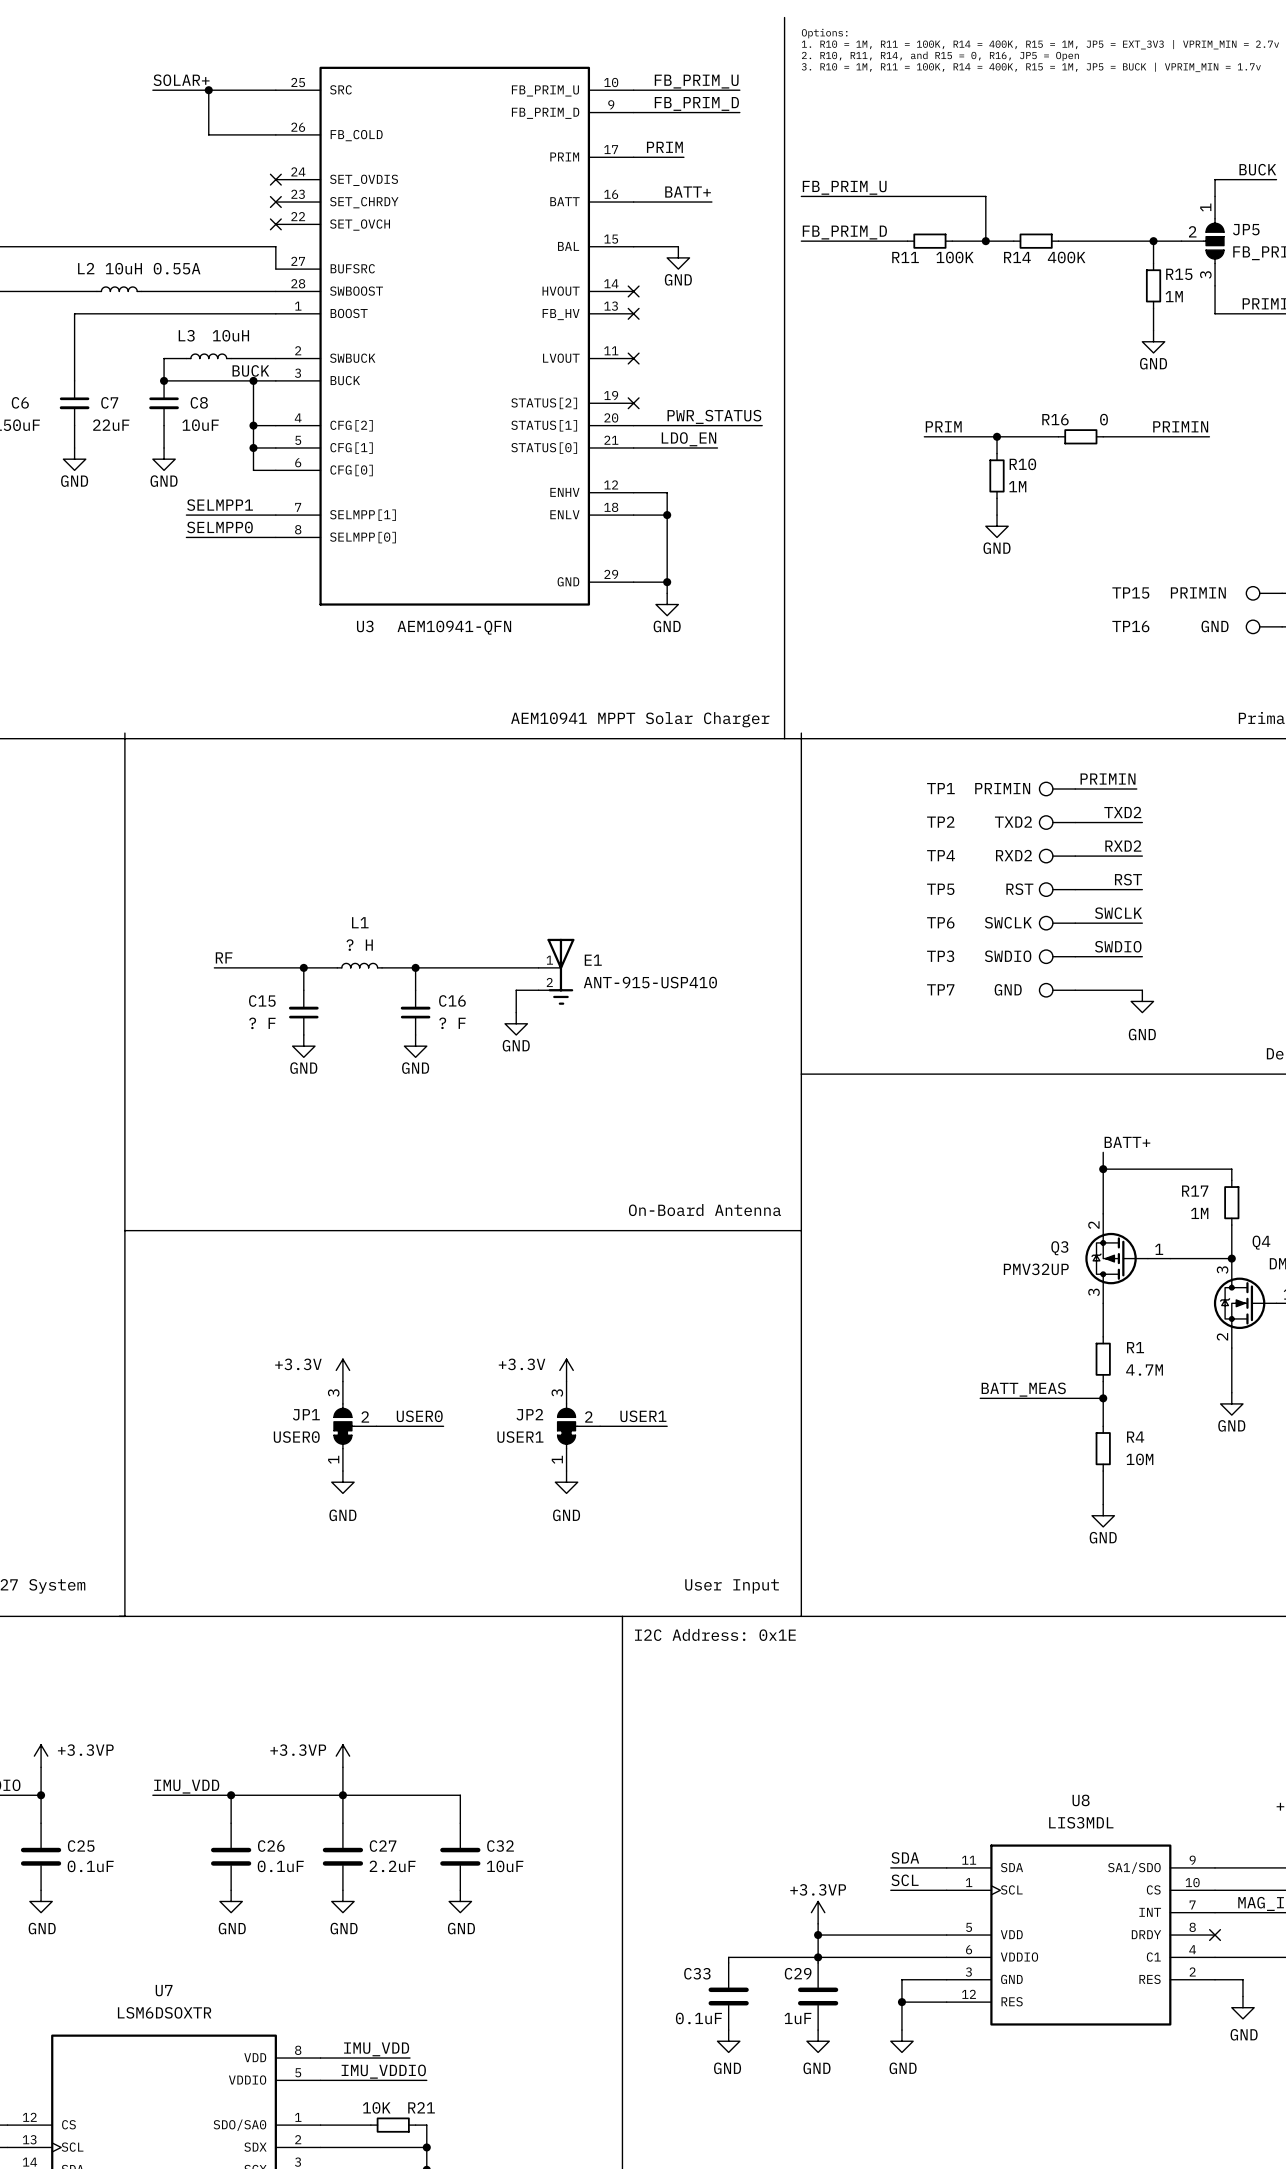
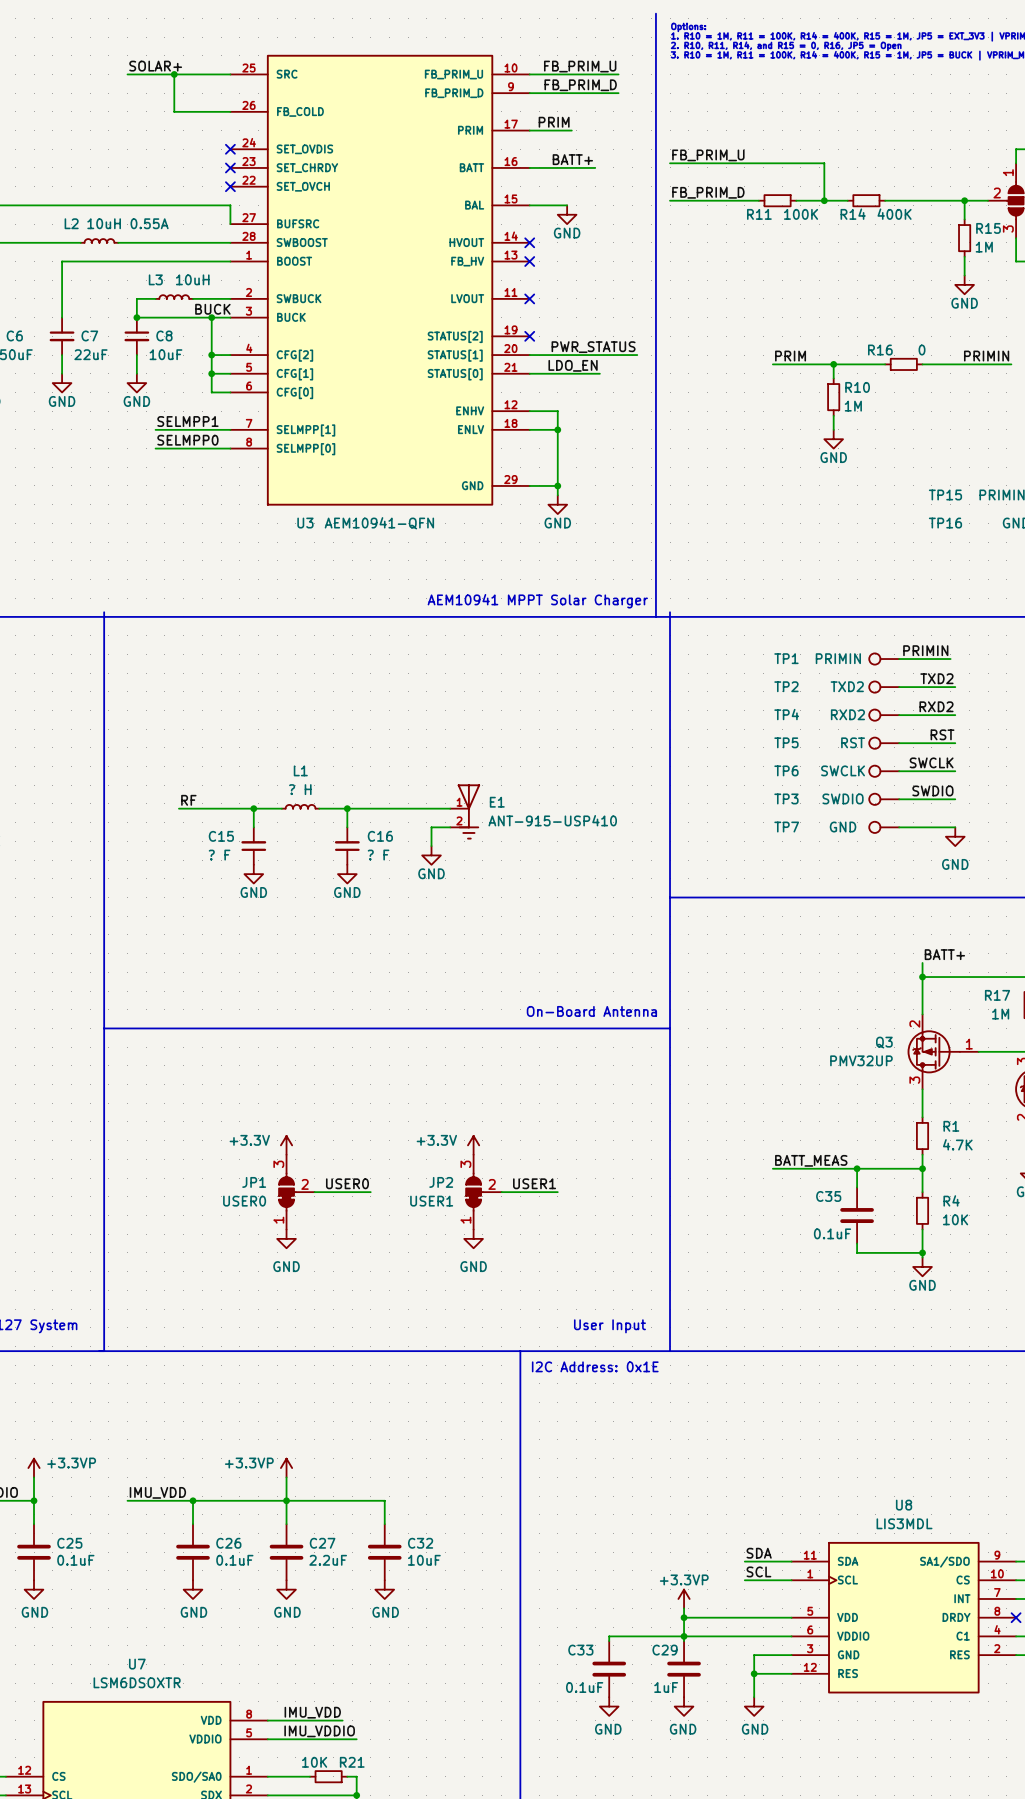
R1 value: 4.7M (1144, 1370) -> 4.7K (957, 1144)
label position: BATT_MEAS (1023, 1389) -> BATT_MEAS (811, 1160)
wire: none -> (772, 1168) (819, 1168)
wire: none -> (857, 1168) (857, 1187)
junction: none -> (857, 1168)
C35: none -> 0.1uF (857, 1215)
R4 value: 10M (1139, 1459) -> 10K (955, 1219)
wire: none -> (857, 1243) (857, 1252) (922, 1252)
junction: none -> (922, 1252)

